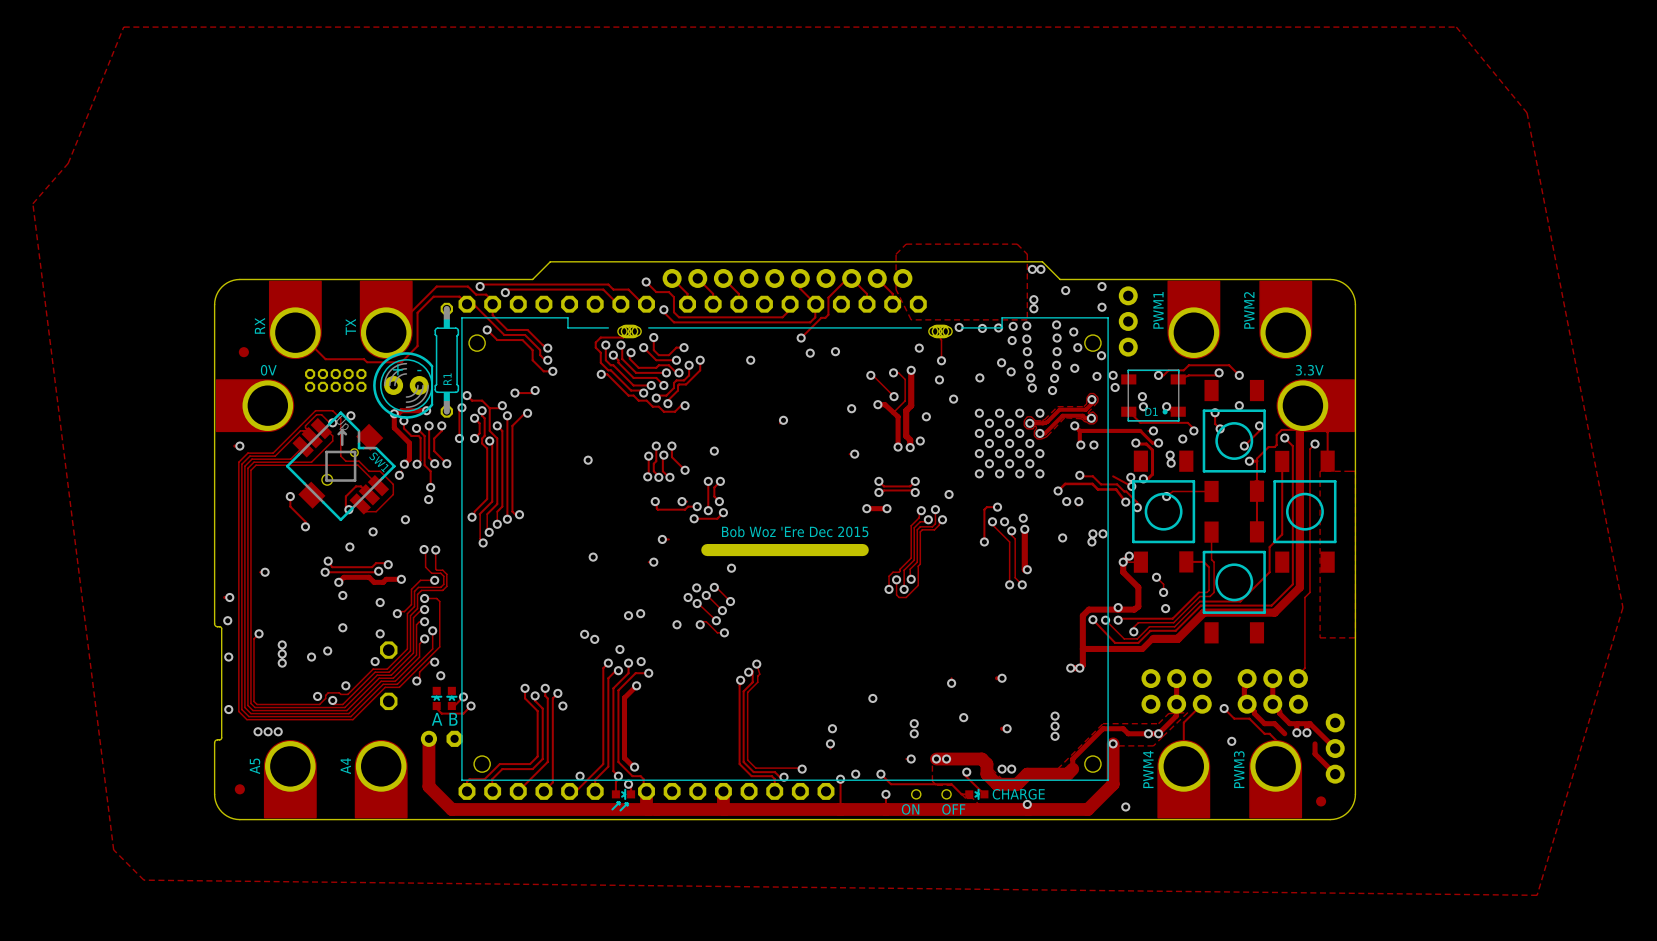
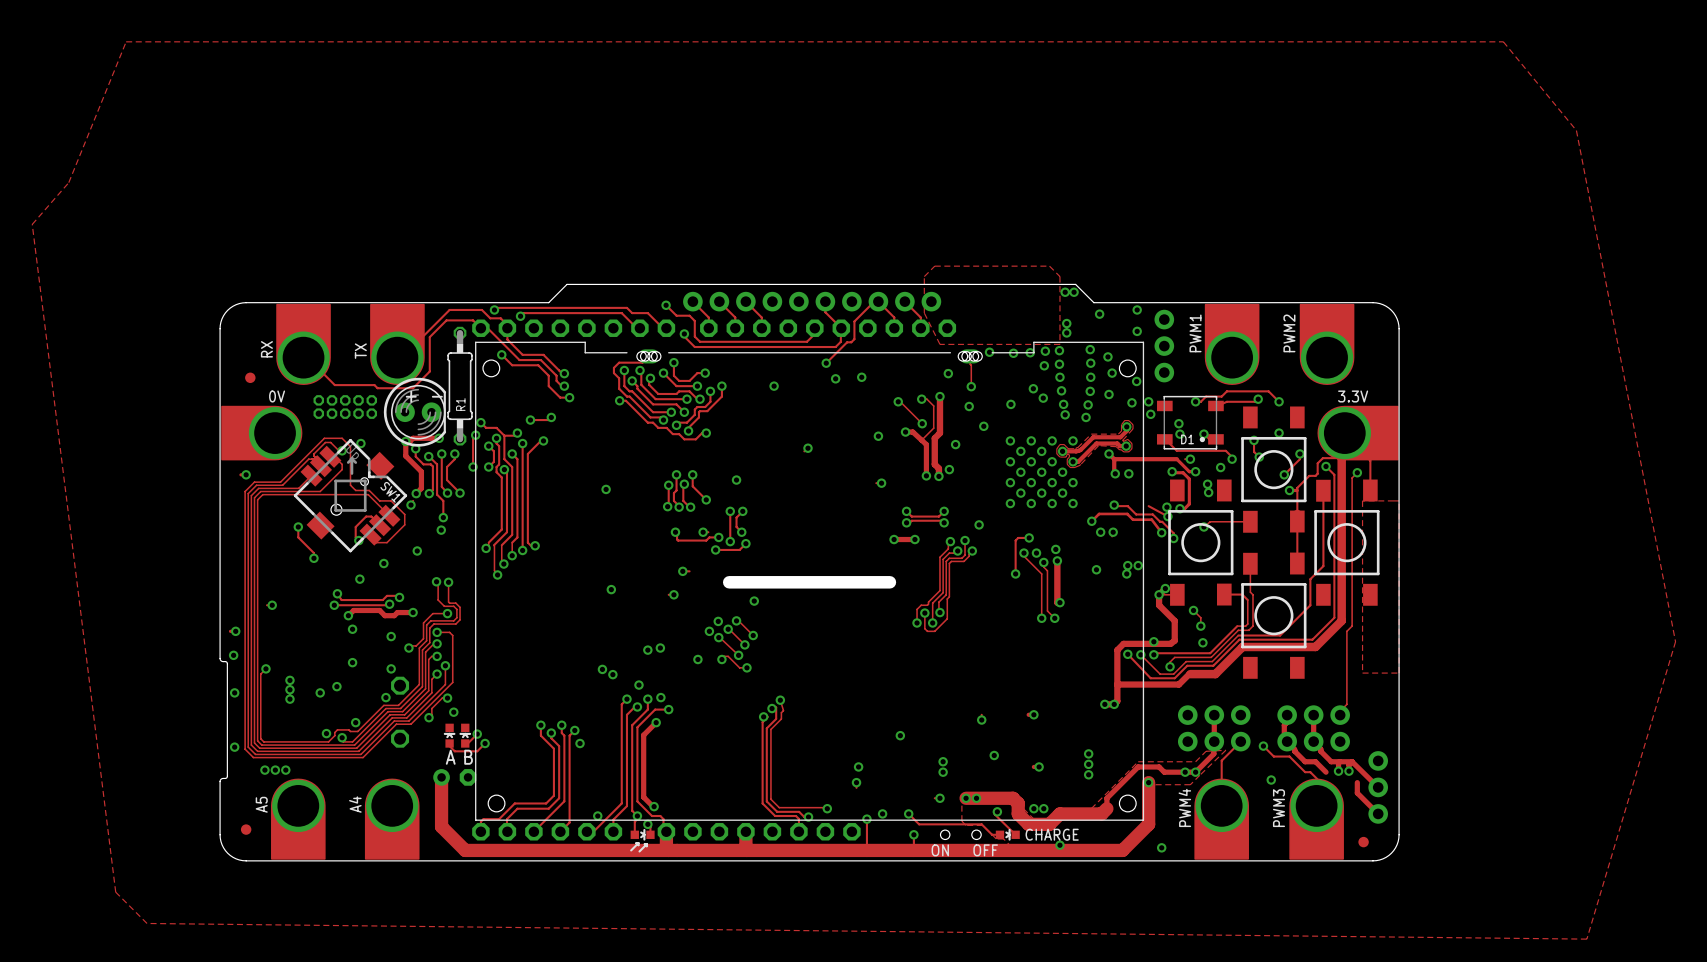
text: Bob Woz 'Ere Dec 2015 (795, 531) -> none

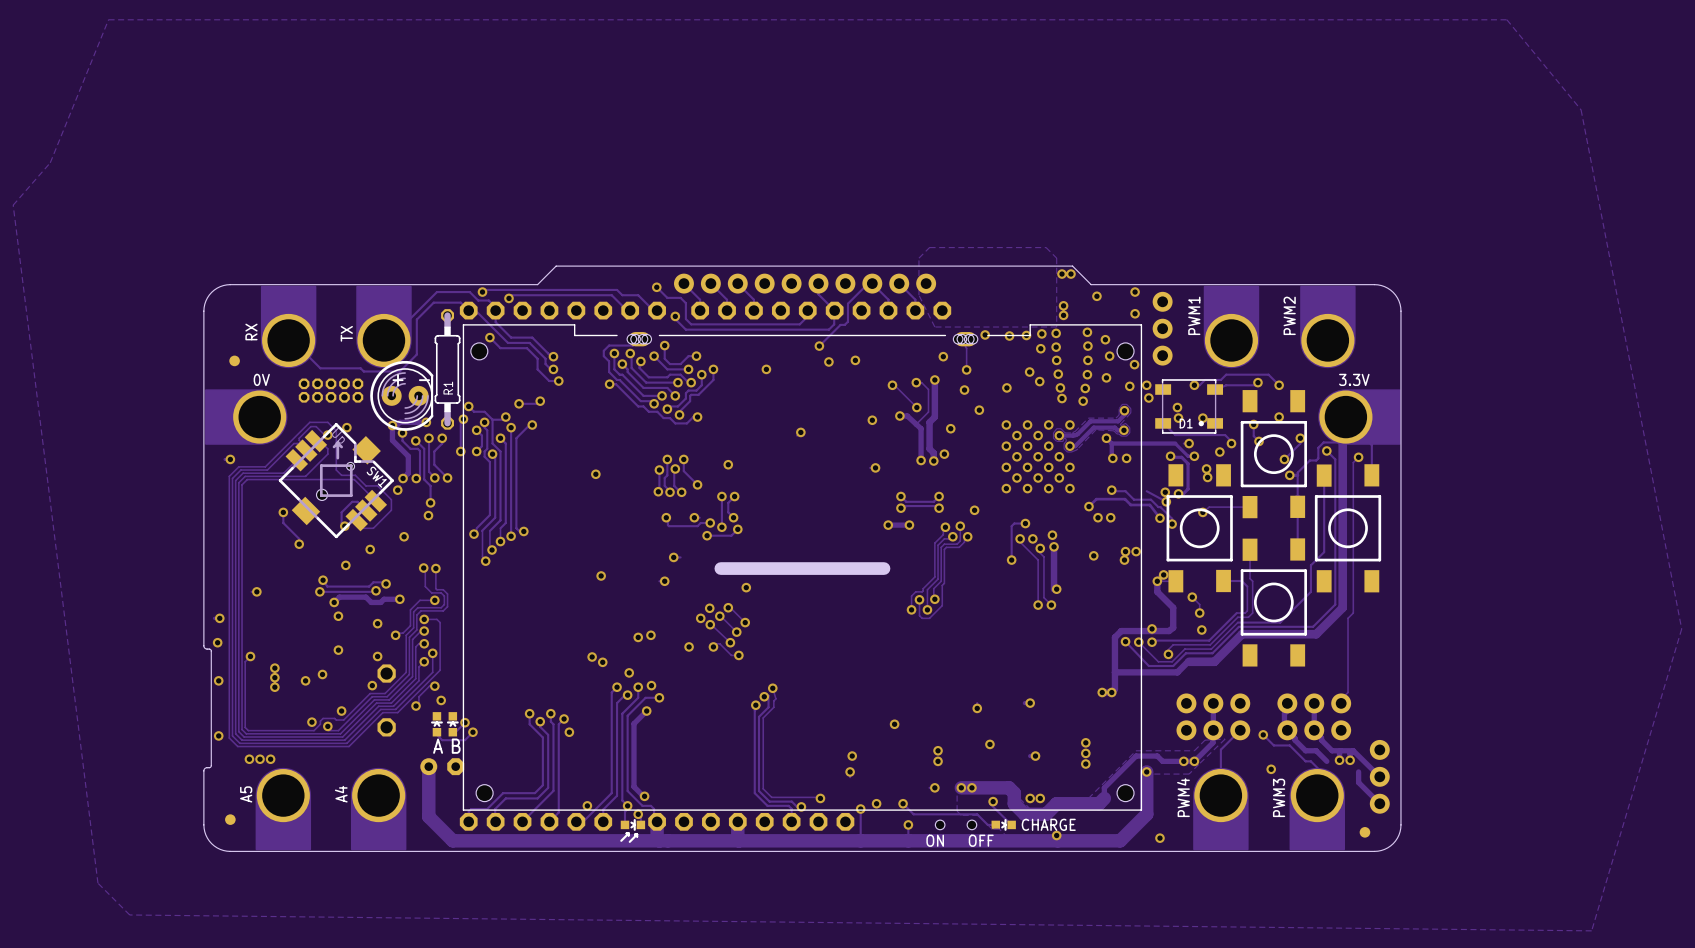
zone outline: (1362, 500) (1399, 500) (1399, 673) (1362, 673) (1362, 500) -> none

